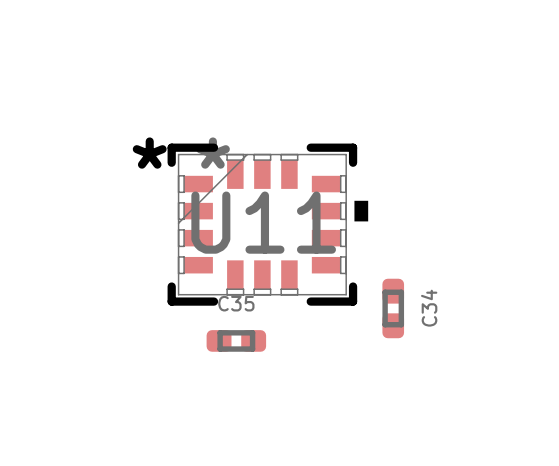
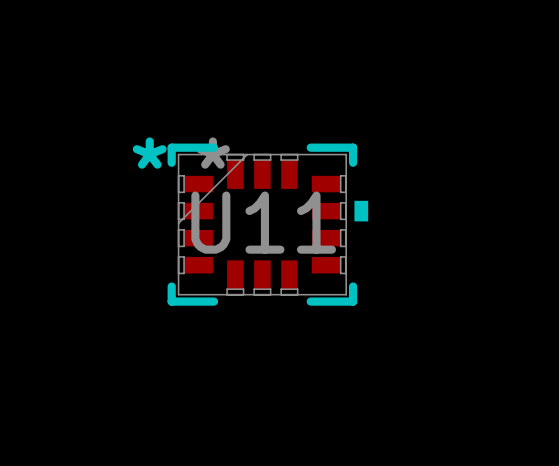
C34: (393, 308) -> none
C35: (236, 340) -> none

